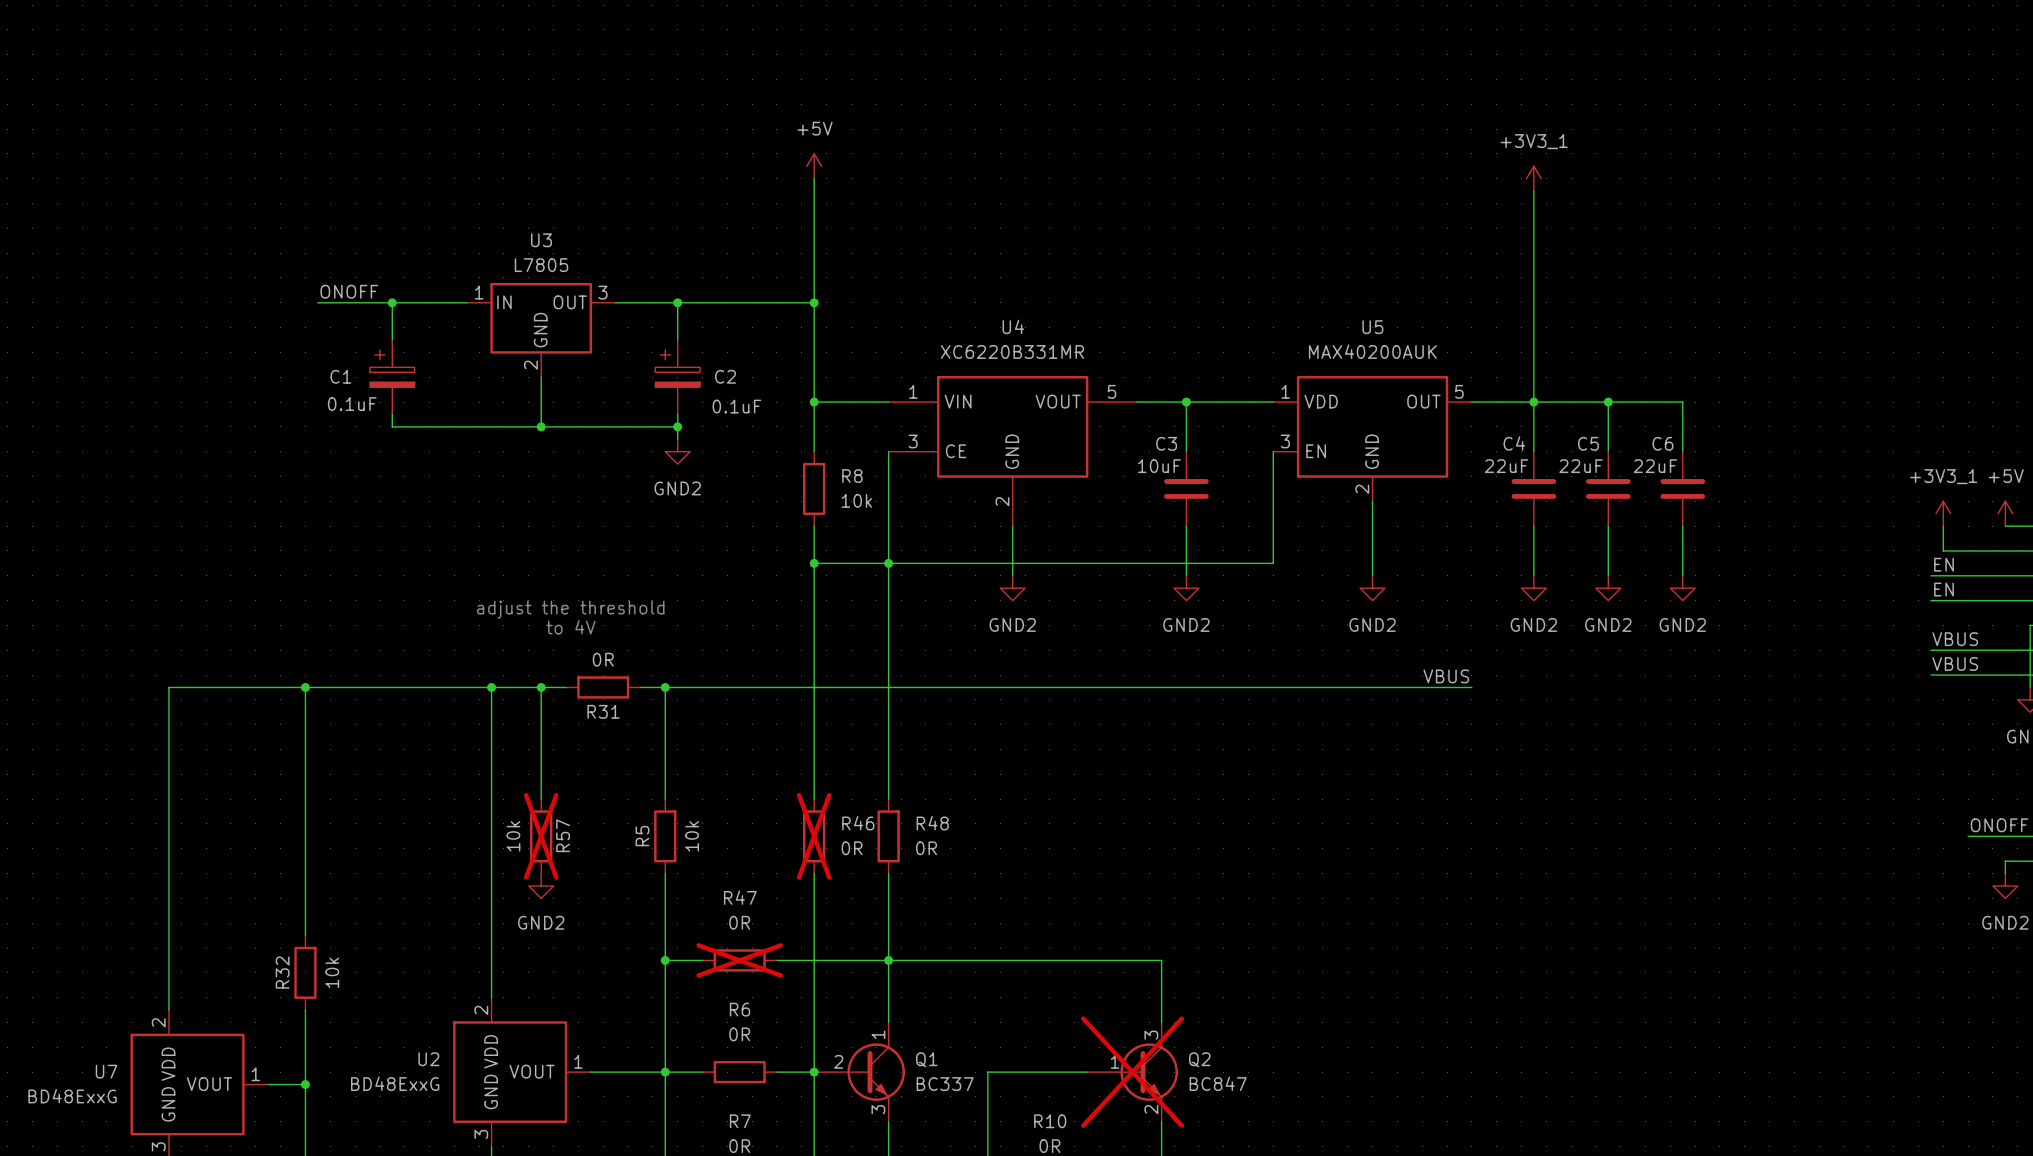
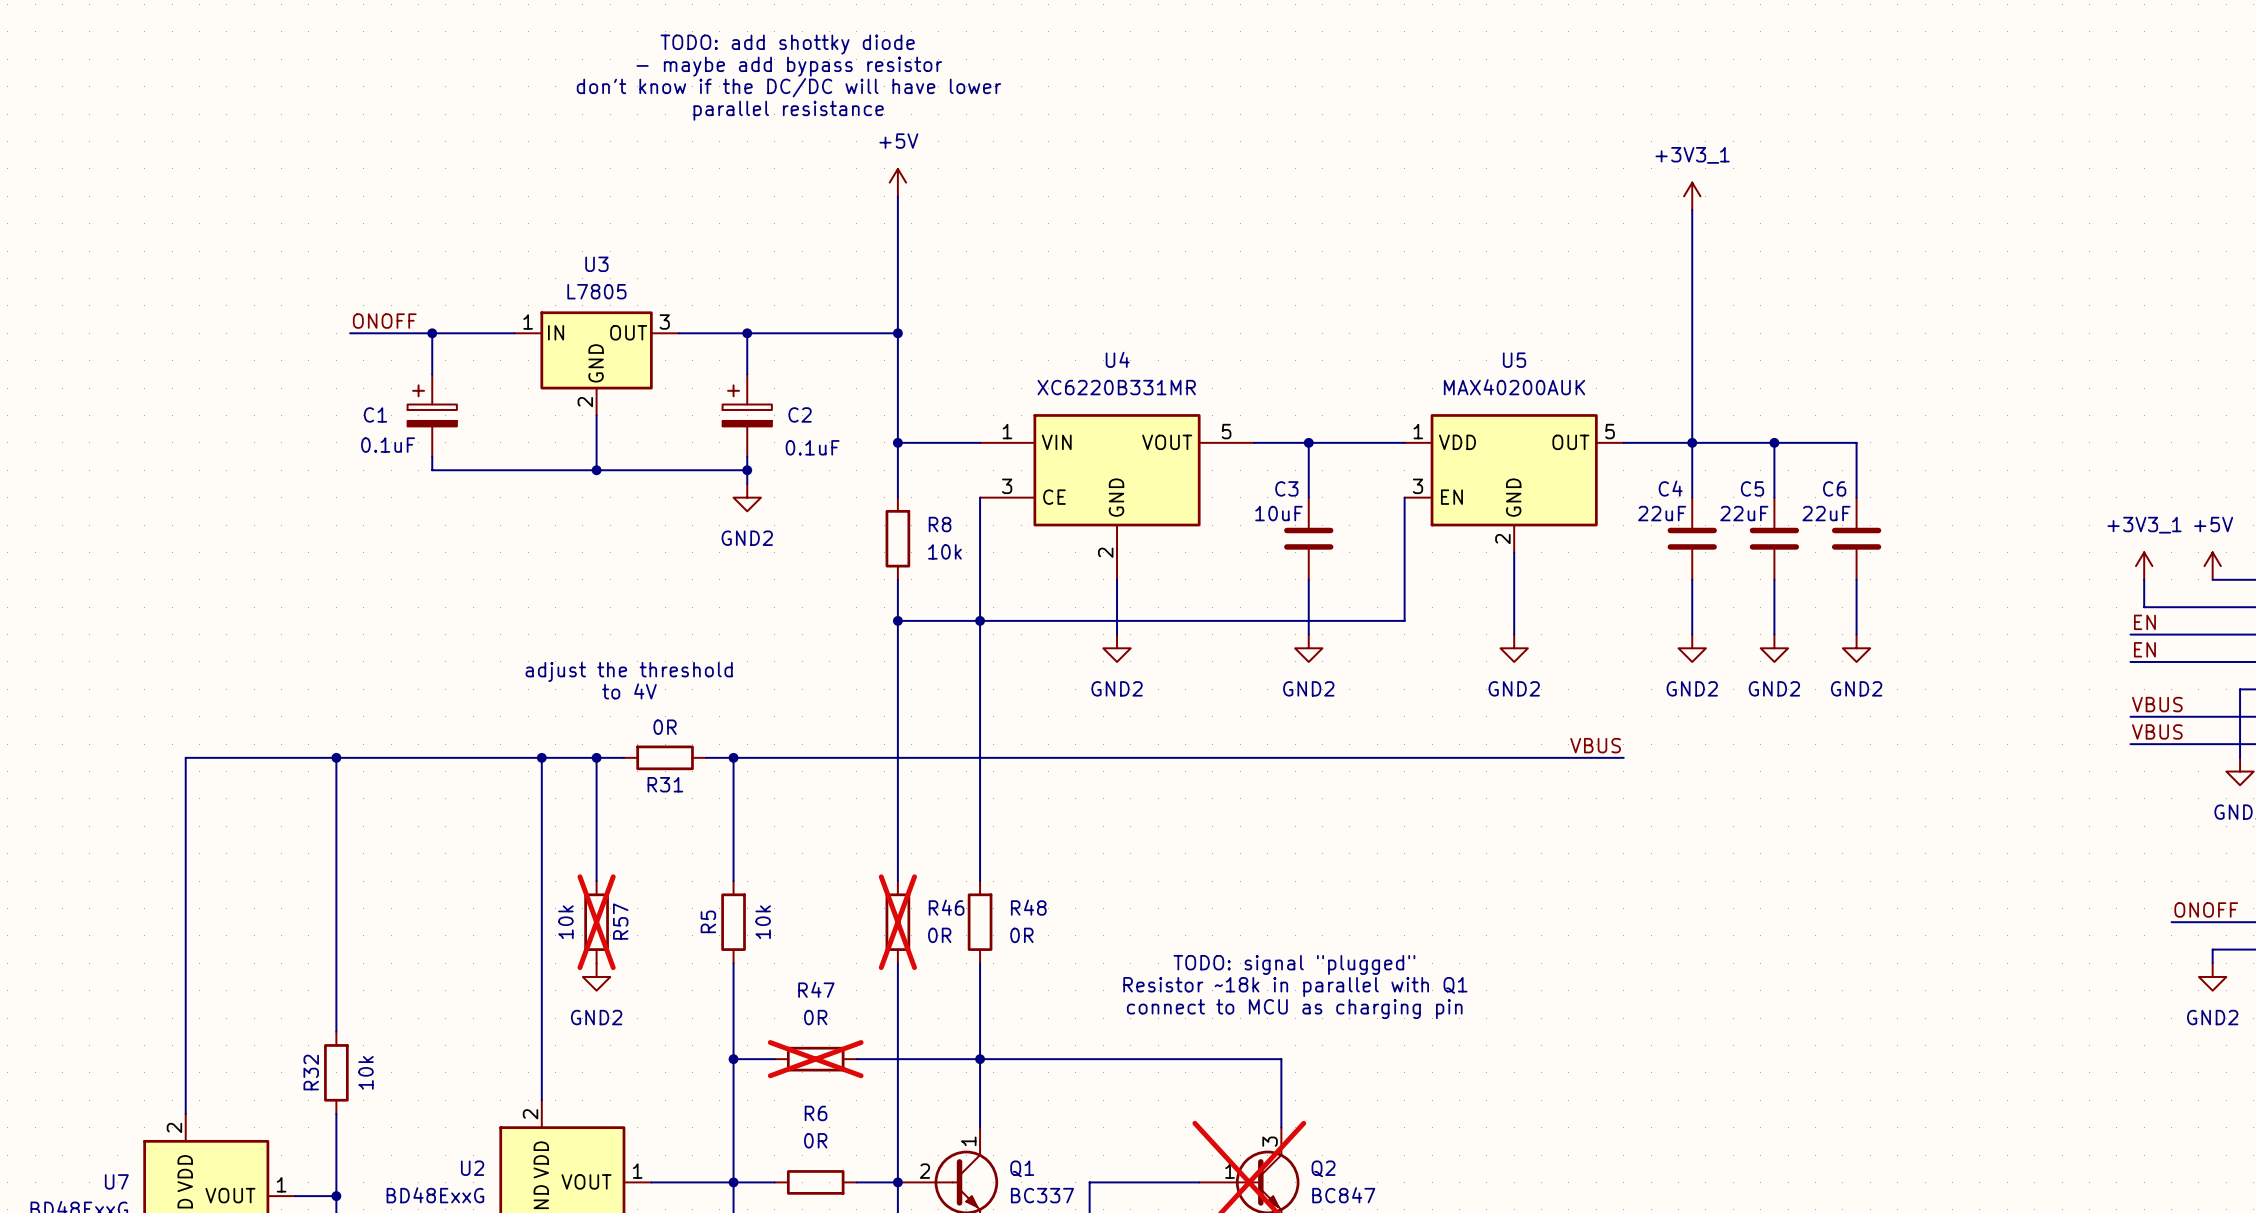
text: none -> TODO: add shottky diode (787, 44)
text: none -> - maybe add bypass resistor (789, 66)
text: none -> don't know if the DC/DC will have lower (788, 87)
text: none -> parallel resistance (788, 110)
text: none -> TODO: signal "plugged" (1294, 964)
text: none -> Resistor ~18k in parallel with Q1 (1295, 987)
text: none -> connect to MCU as charging pin (1294, 1009)

